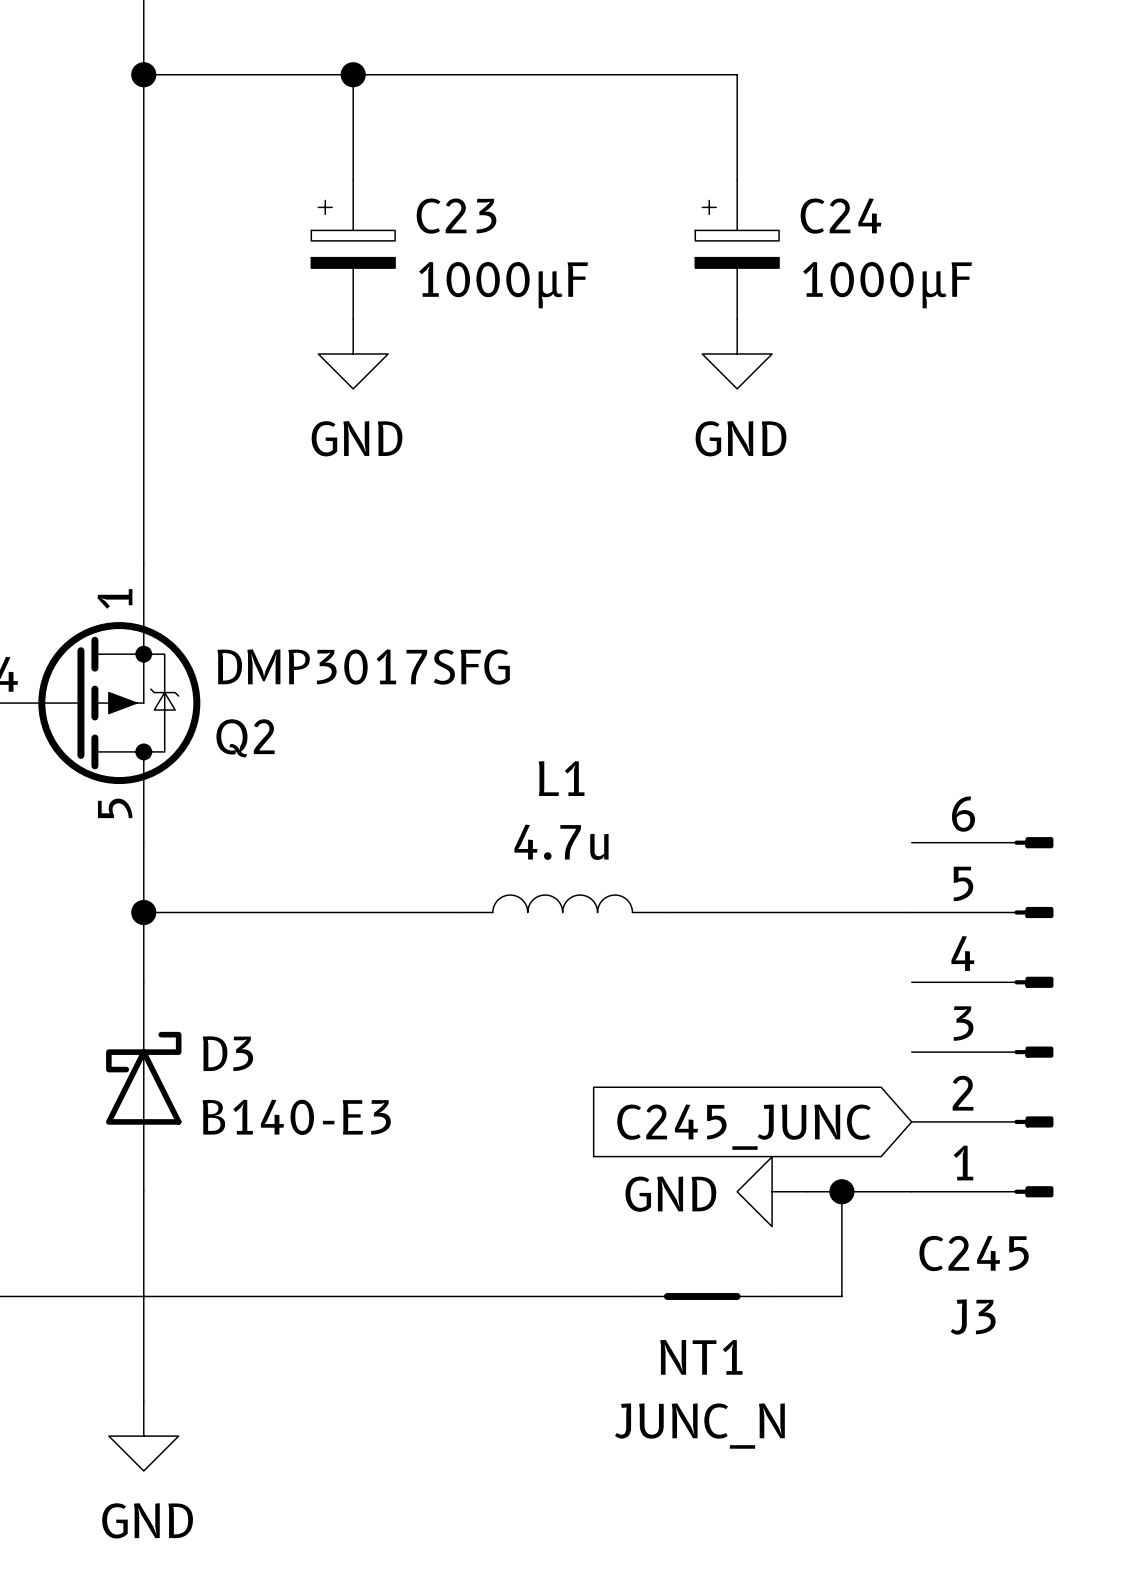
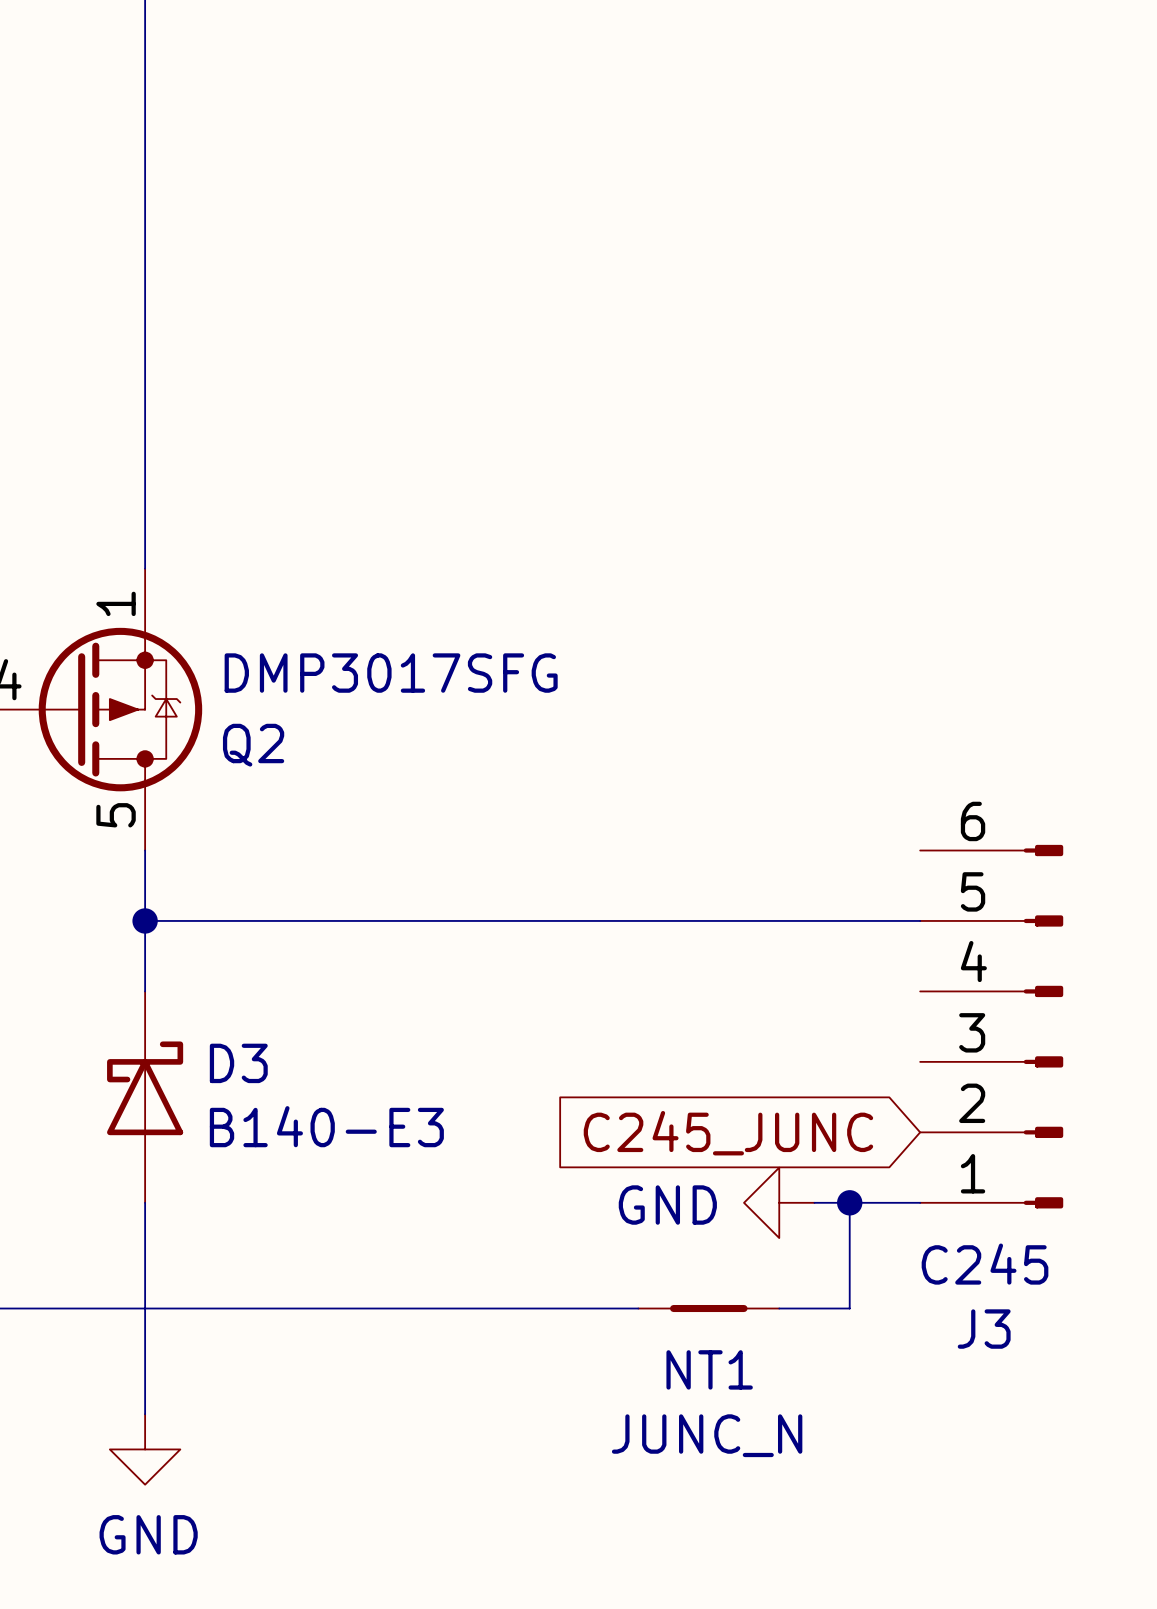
wire: (143, 74) (737, 74) (737, 179) -> none
junction: (143, 74) -> none
wire: (353, 74) (353, 179) -> none
junction: (353, 74) -> none
C23: 1000µF (353, 249) -> none
C24: 1000µF (737, 249) -> none
power symbol: GND (353, 353) -> none
power symbol: GND (737, 353) -> none
L1: 4.7u (562, 903) -> none
wire: none -> (462, 920) (673, 920)

